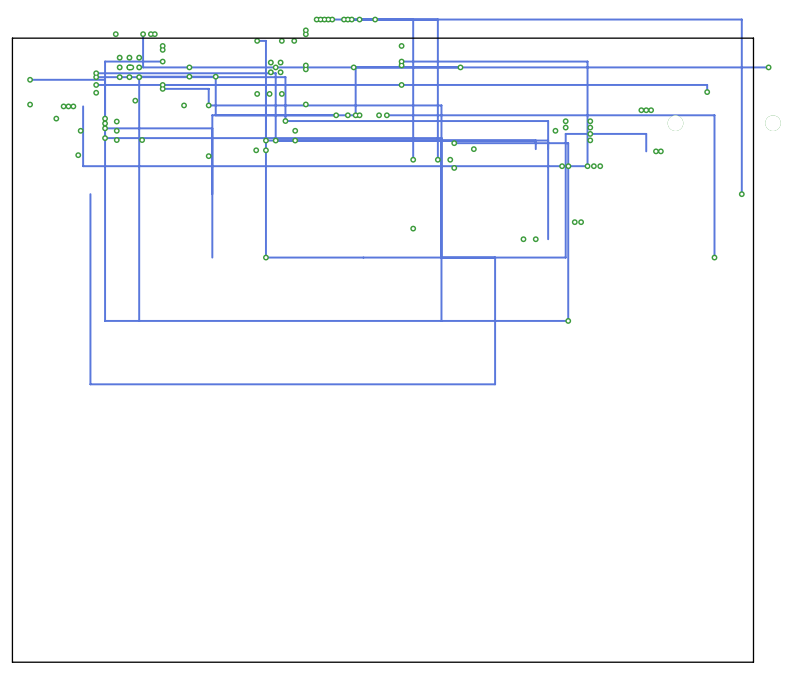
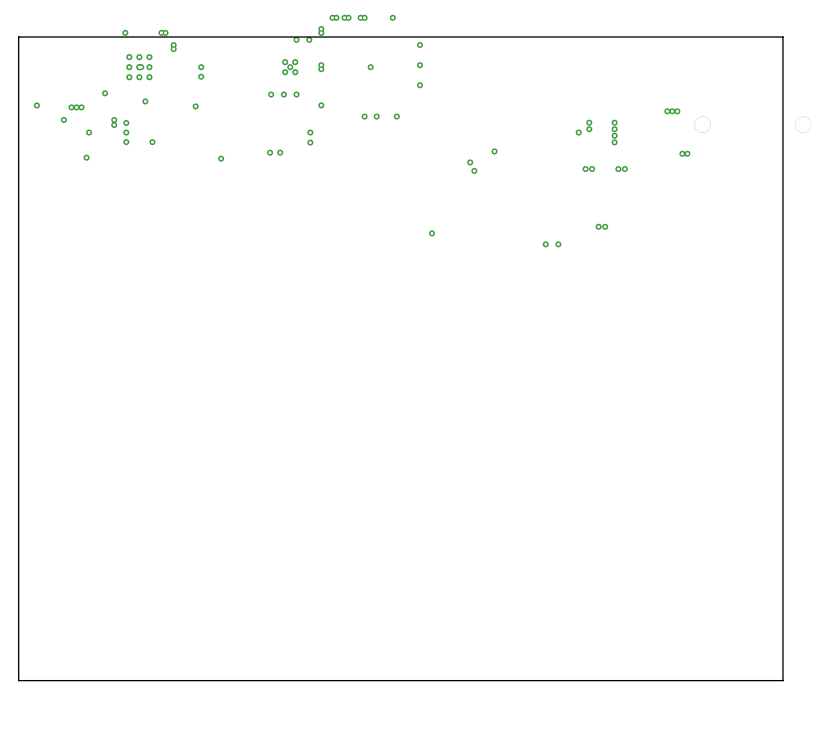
track: (324, 19) (741, 19) (741, 194) -> none
via: (324, 19) -> none
via: (351, 19) -> none
via: (359, 19) -> none
track: (413, 19) (413, 159) -> none
track: (437, 19) (437, 159) -> none
track: (143, 34) (143, 67) (768, 67) -> none
via: (143, 34) -> none
track: (257, 40) (265, 40) (265, 257) (565, 257) (565, 133) (646, 133) (646, 151) -> none
via: (257, 40) -> none
track: (162, 61) (105, 61) (105, 320) (568, 320) (568, 143) (454, 143) -> none
via: (162, 61) -> none
track: (401, 61) (587, 61) (587, 166) (83, 166) (83, 106) -> none
via: (401, 61) -> none
track: (355, 67) (355, 115) (212, 115) (212, 257) -> none
via: (460, 67) -> none
via: (768, 67) -> none
track: (96, 73) (275, 73) (275, 140) -> none
via: (96, 73) -> none
via: (215, 76) -> none
track: (96, 77) (285, 77) (285, 121) (548, 121) (548, 239) -> none
via: (96, 77) -> none
via: (30, 79) -> none
track: (105, 79) (30, 79) -> none
track: (96, 84) (707, 84) (707, 92) -> none
via: (96, 84) -> none
via: (162, 84) -> none
track: (162, 88) (208, 88) (208, 105) (441, 105) (441, 320) -> none
via: (162, 88) -> none
via: (707, 92) -> none
via: (208, 105) -> none
track: (215, 115) (215, 76) (139, 76) (139, 320) -> none
via: (336, 115) -> none
via: (355, 115) -> none
track: (386, 115) (714, 115) (714, 257) -> none
via: (386, 115) -> none
via: (285, 121) -> none
via: (105, 128) -> none
track: (212, 128) (105, 128) -> none
via: (105, 138) -> none
track: (441, 138) (105, 138) -> none
via: (265, 140) -> none
via: (275, 140) -> none
track: (535, 140) (535, 149) -> none
track: (548, 140) (265, 140) -> none
via: (454, 143) -> none
via: (413, 159) -> none
via: (437, 159) -> none
via: (587, 166) -> none
track: (90, 194) (90, 384) (495, 384) (495, 257) -> none
via: (741, 194) -> none
via: (265, 257) -> none
via: (714, 257) -> none
via: (568, 320) -> none

